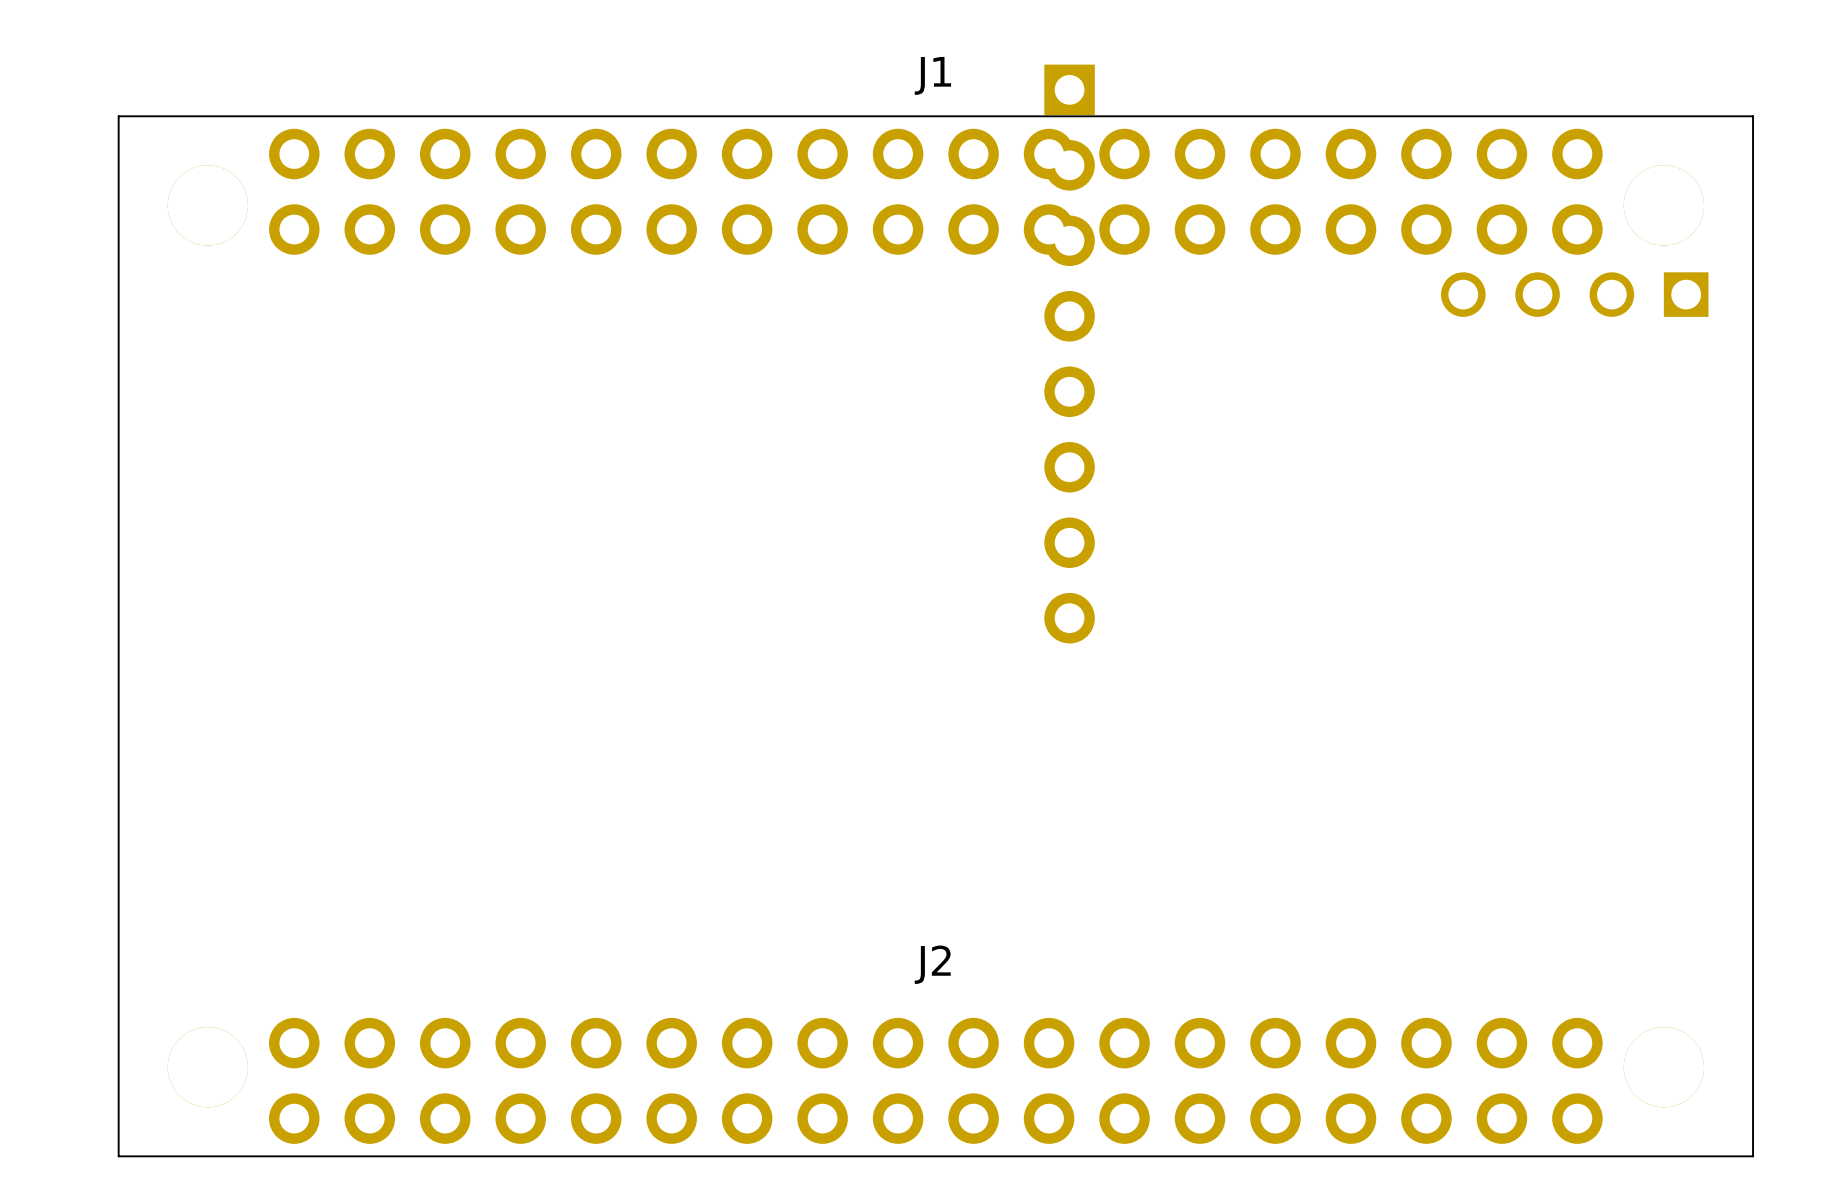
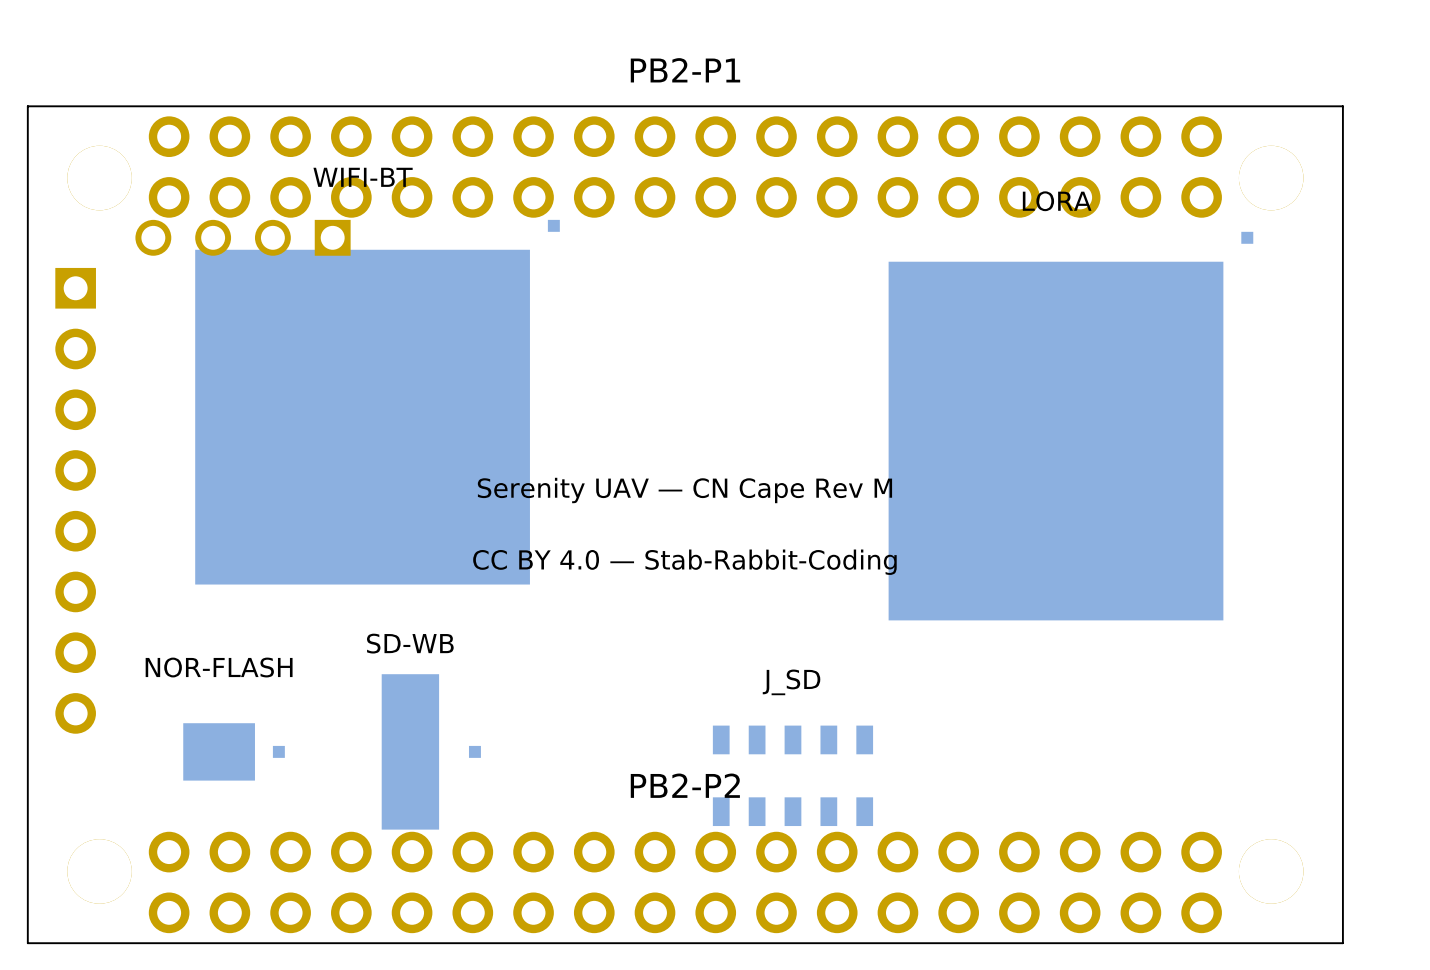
J1 name: J1 (932, 75) -> PB2-P1 (685, 70)
part: none -> (243, 237)
part: (1574, 294) -> none
part: (1069, 354) -> none
WIFI-BT: none -> (377, 402)
LORA: none -> (1070, 426)
text: none -> Serenity UAV — CN Cape Rev M (684, 490)
part: none -> (75, 500)
text: none -> CC BY 4.0 — Stab-Rabbit-Coding (684, 562)
NOR-FLASH: none -> (234, 751)
SD-WB: none -> (431, 751)
J_SD: none -> (792, 775)
J2 name: J2 (932, 964) -> PB2-P2 (685, 785)

